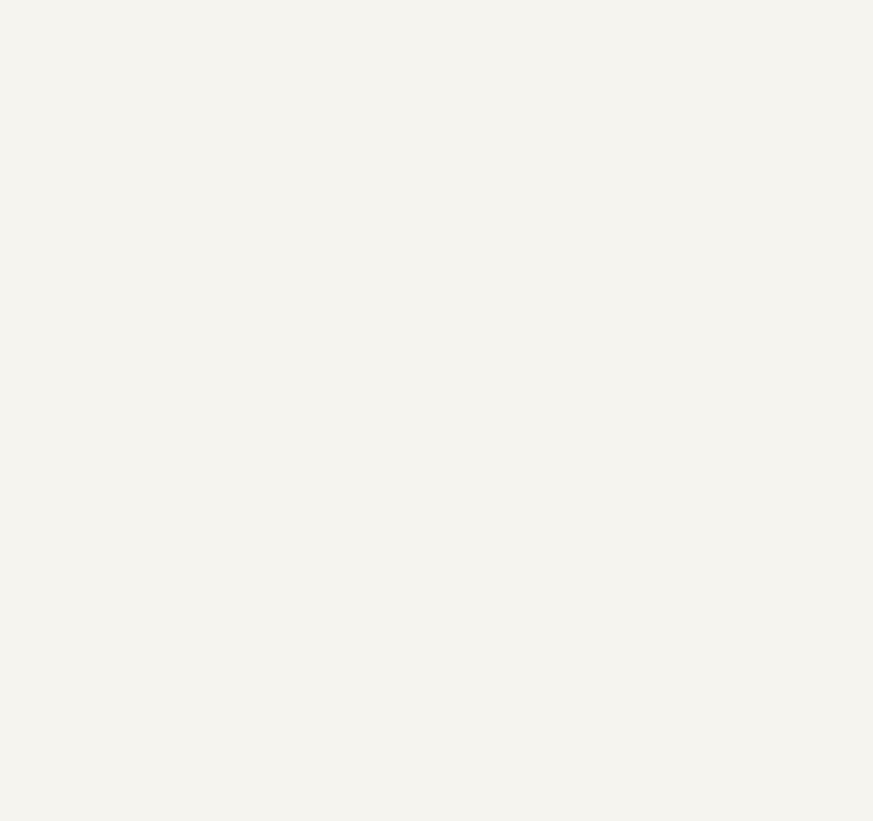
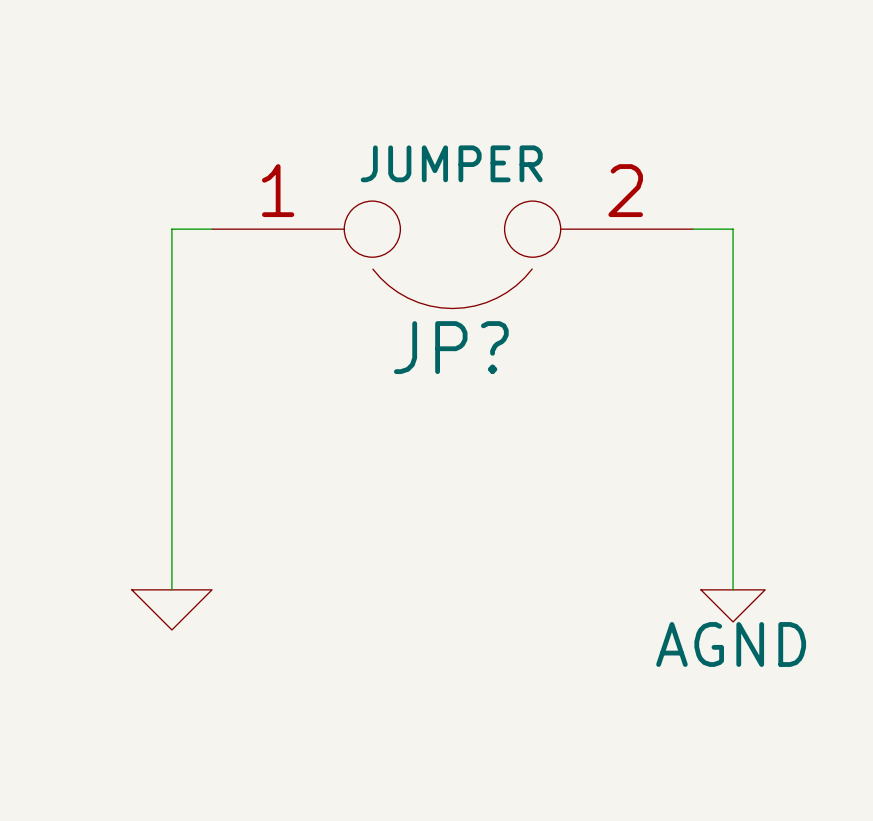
wire: none -> (212, 229) (171, 229) (171, 589)
wire: none -> (692, 229) (733, 229) (733, 589)
JP?: none -> JUMPER (452, 254)
power symbol: none -> AGND (733, 605)
power symbol: none -> (171, 609)

